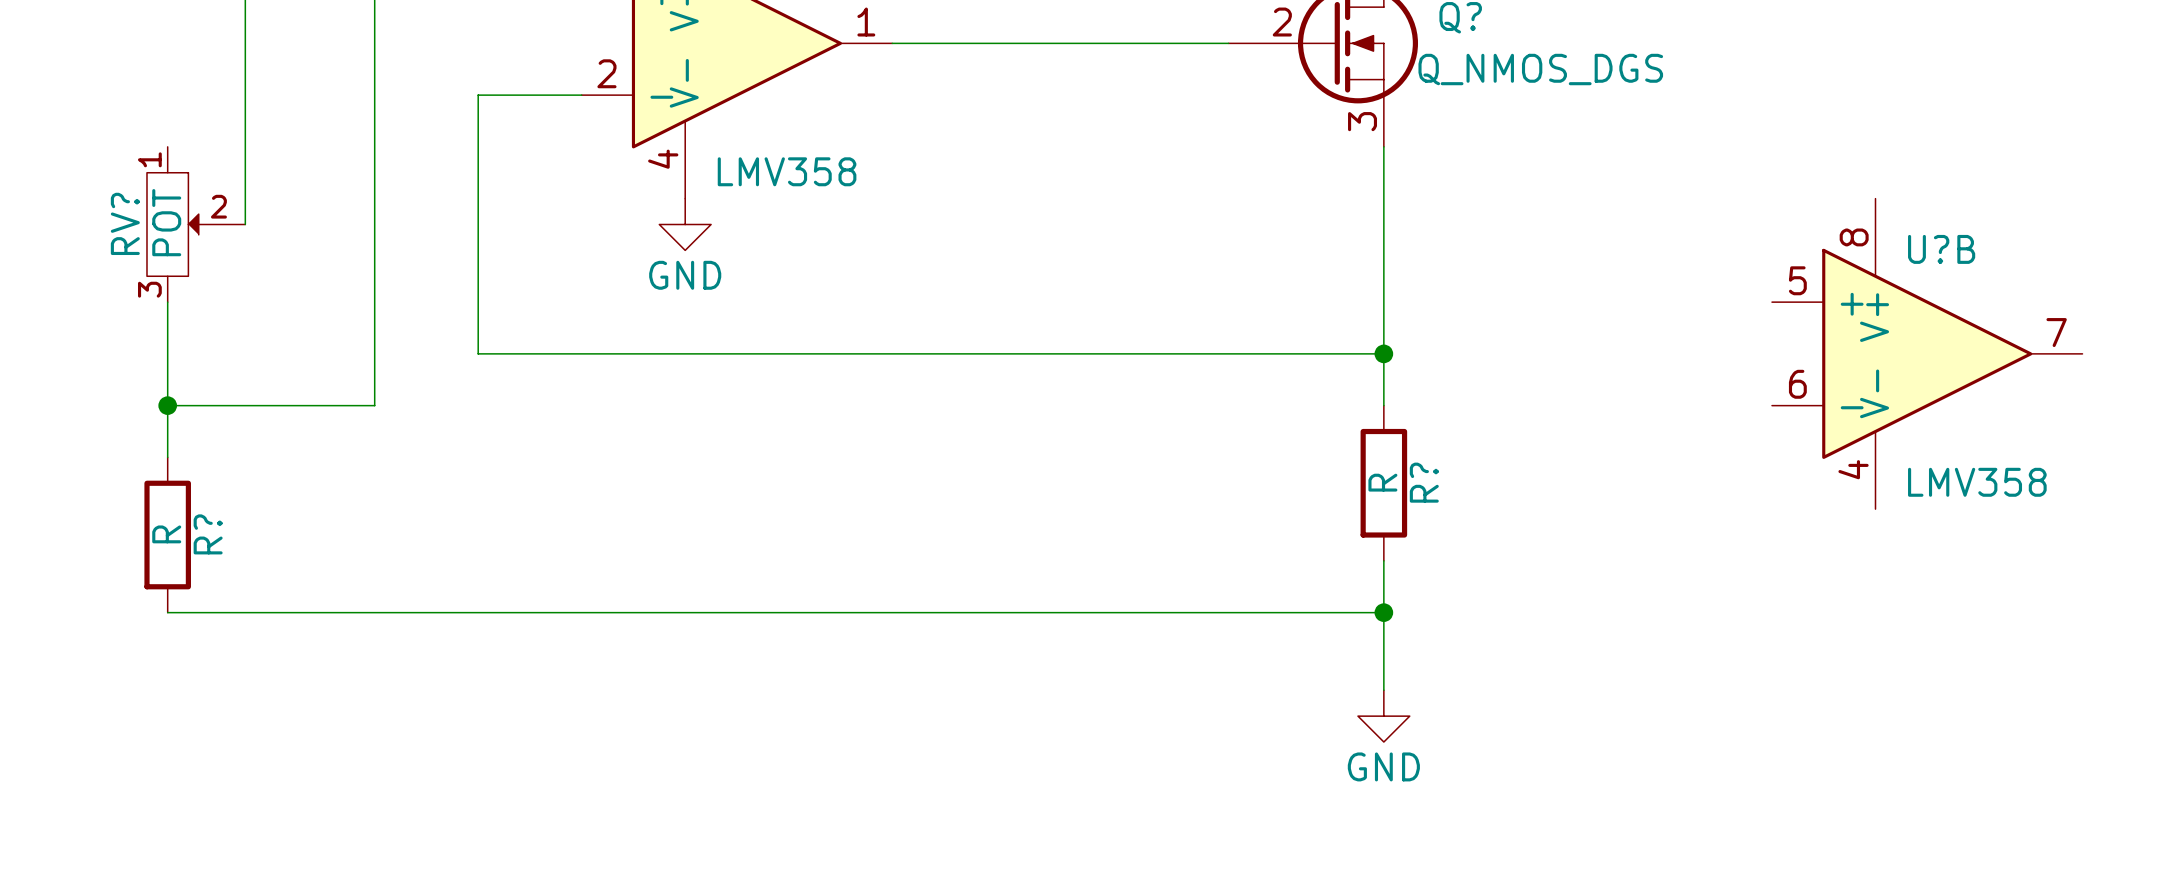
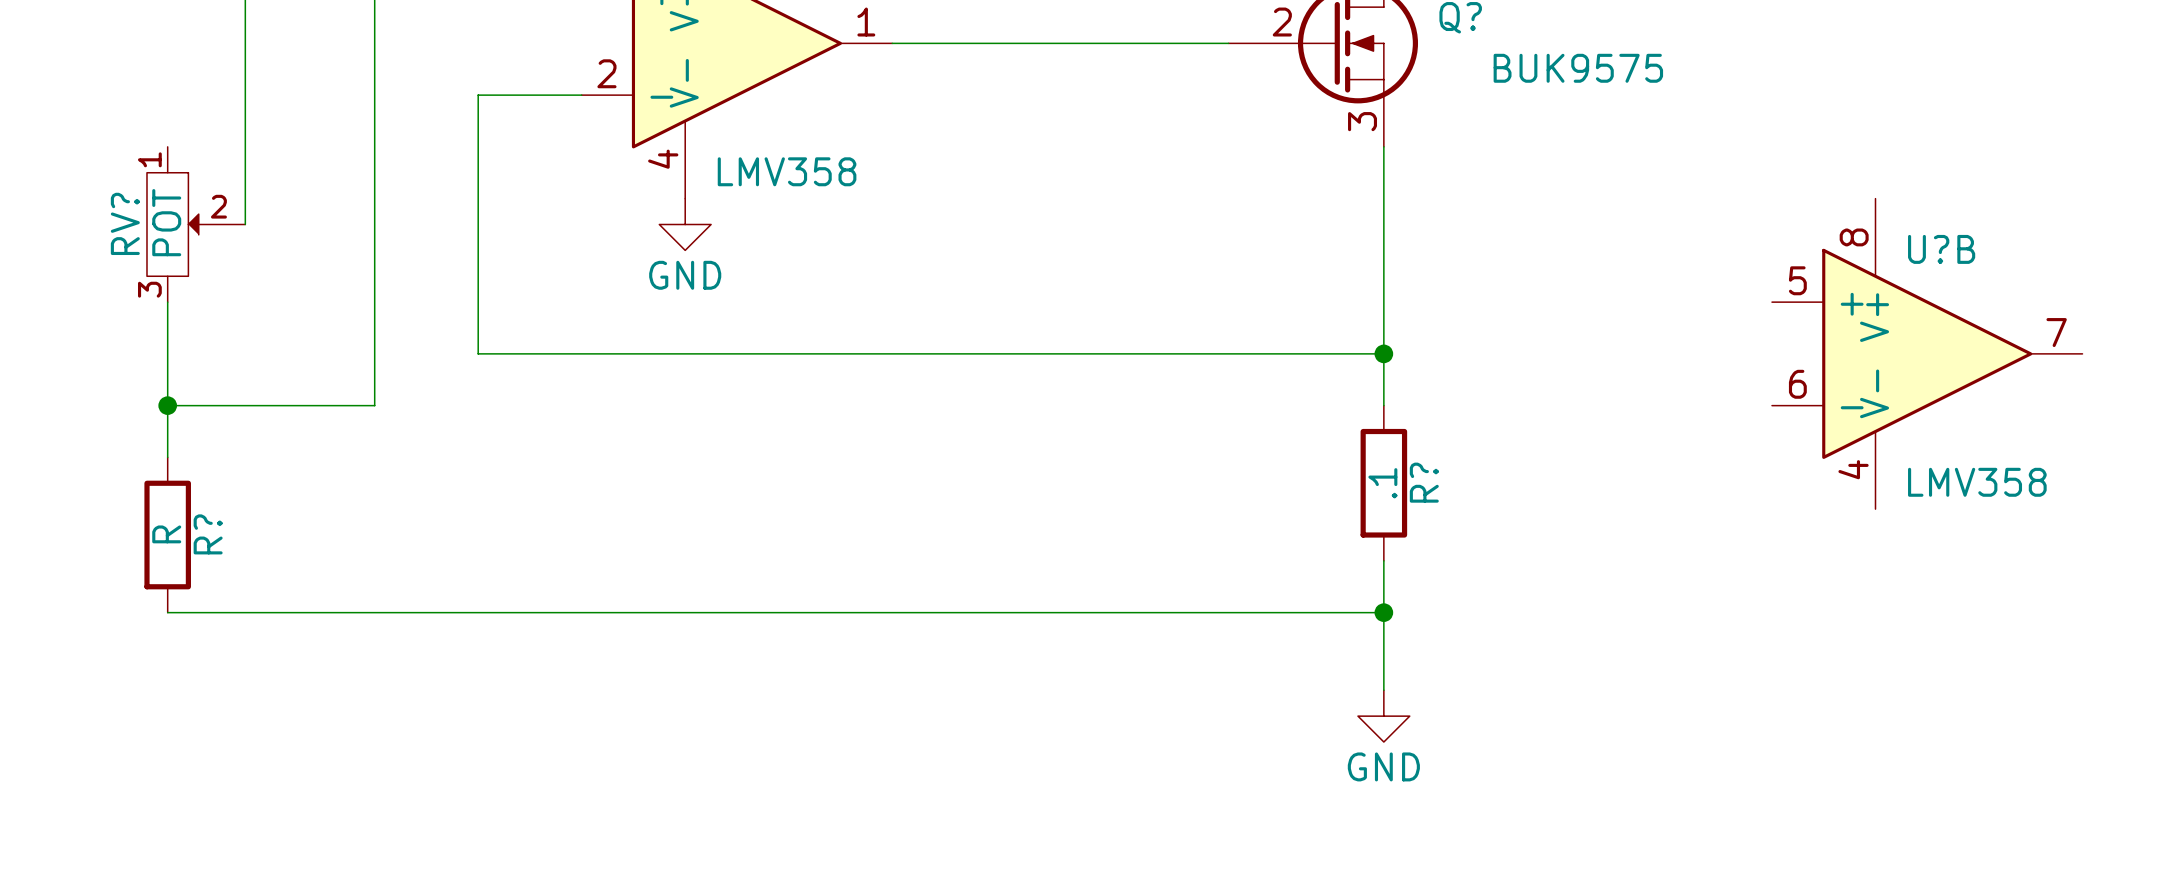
Q? value: Q_NMOS_DGS (1540, 69) -> BUK9575 (1578, 68)
R? value: R (1382, 482) -> .1 (1382, 483)

